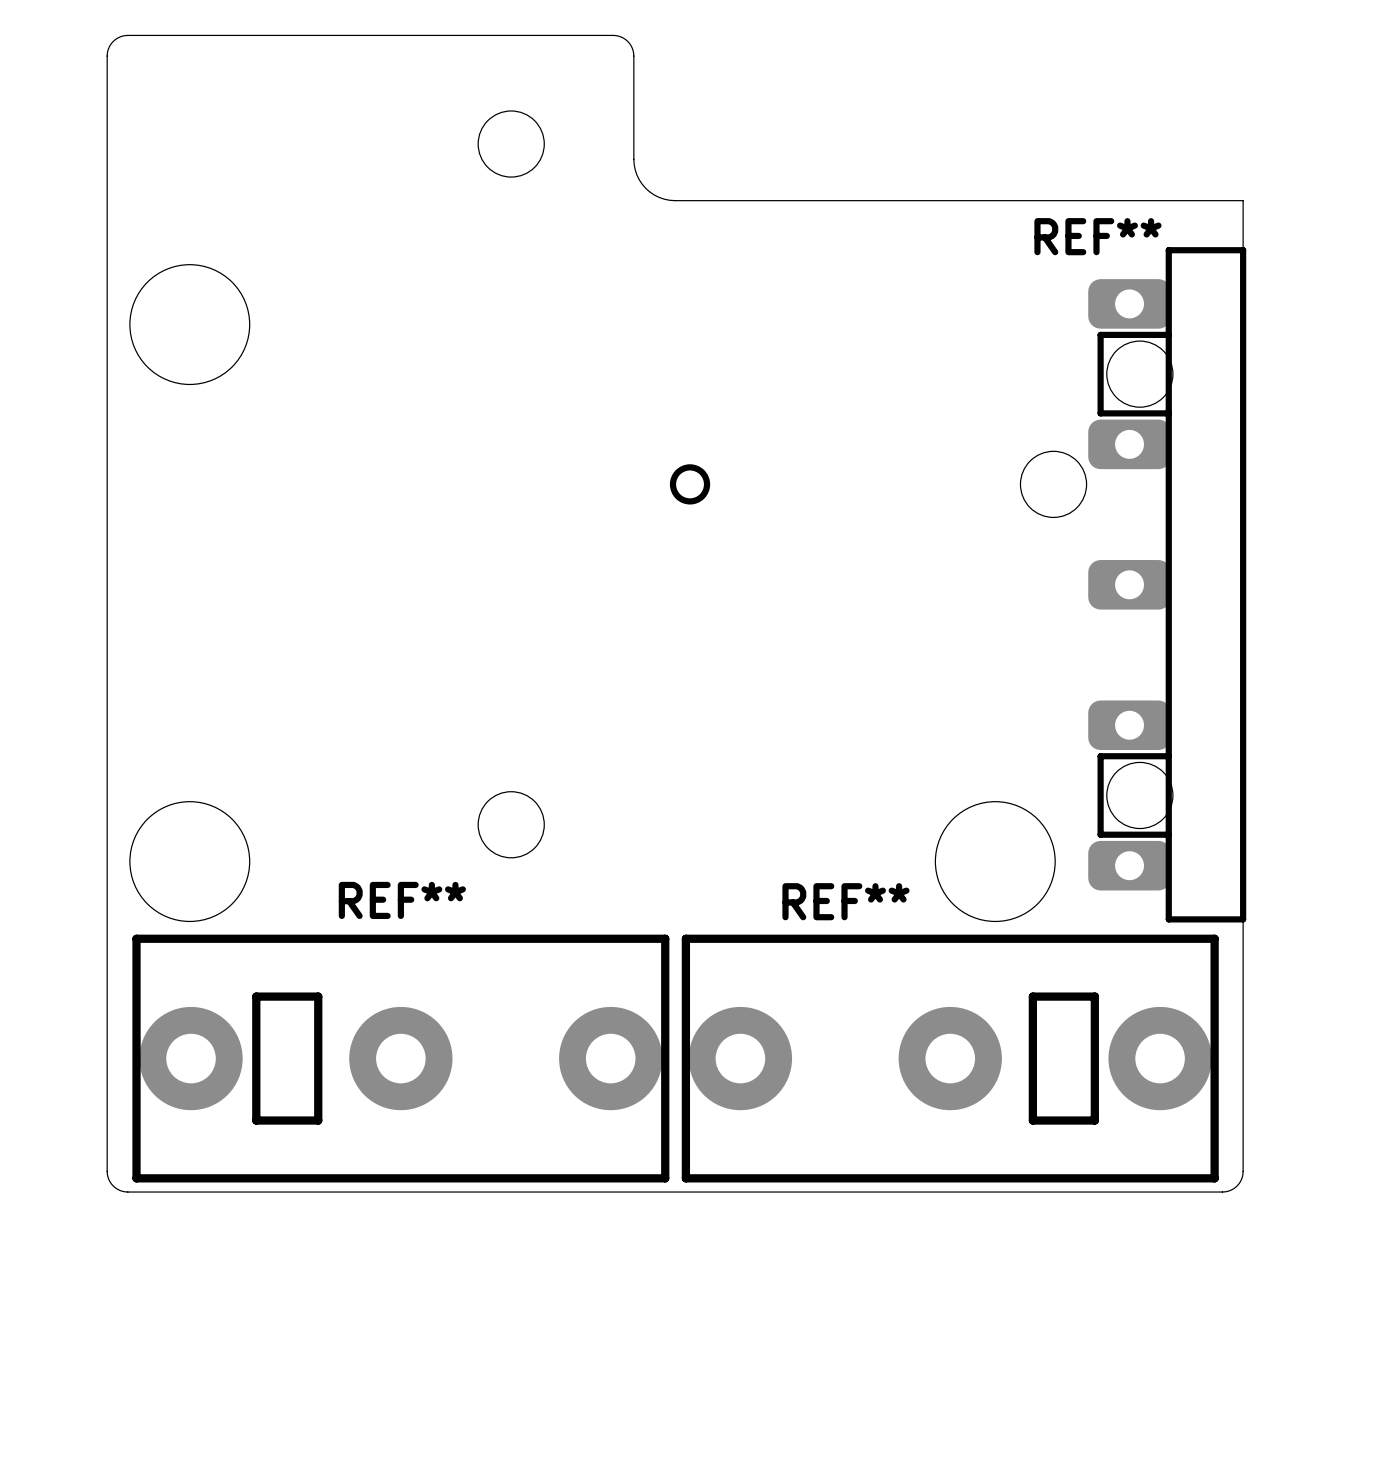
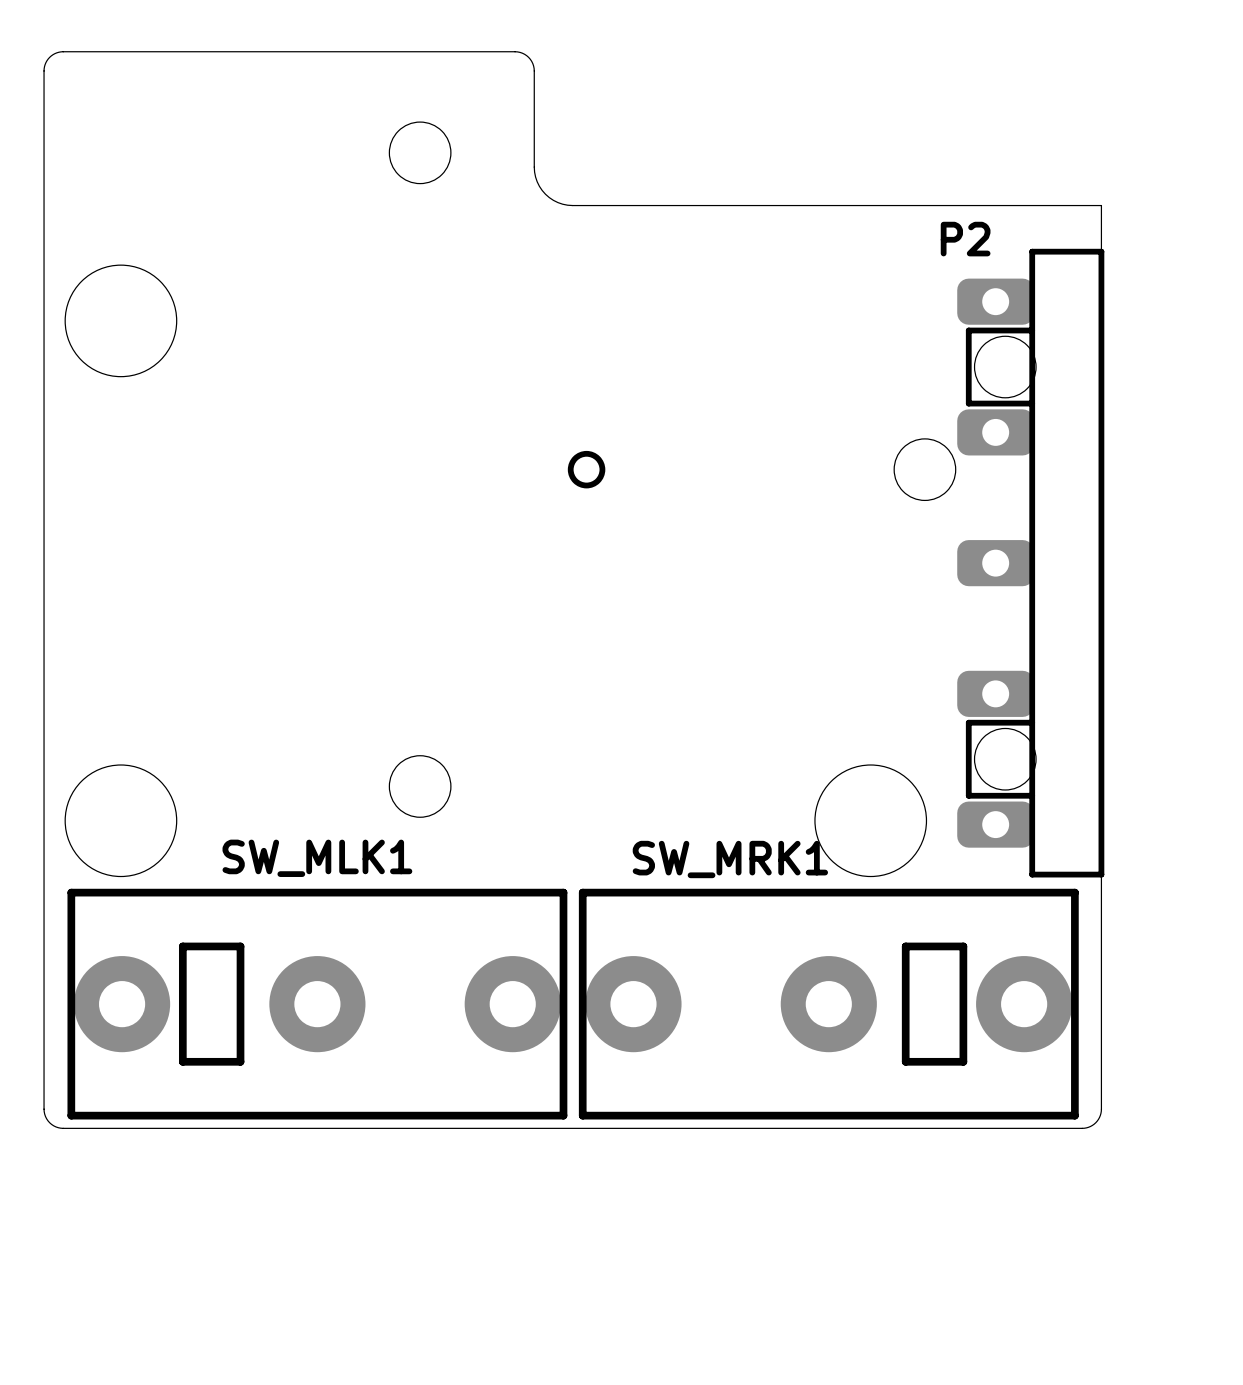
REF** name: REF** (1097, 236) -> P2 (965, 239)
REF** name: REF** (402, 900) -> SW_MLK1 (317, 858)
REF** name: REF** (845, 901) -> SW_MRK1 (730, 859)

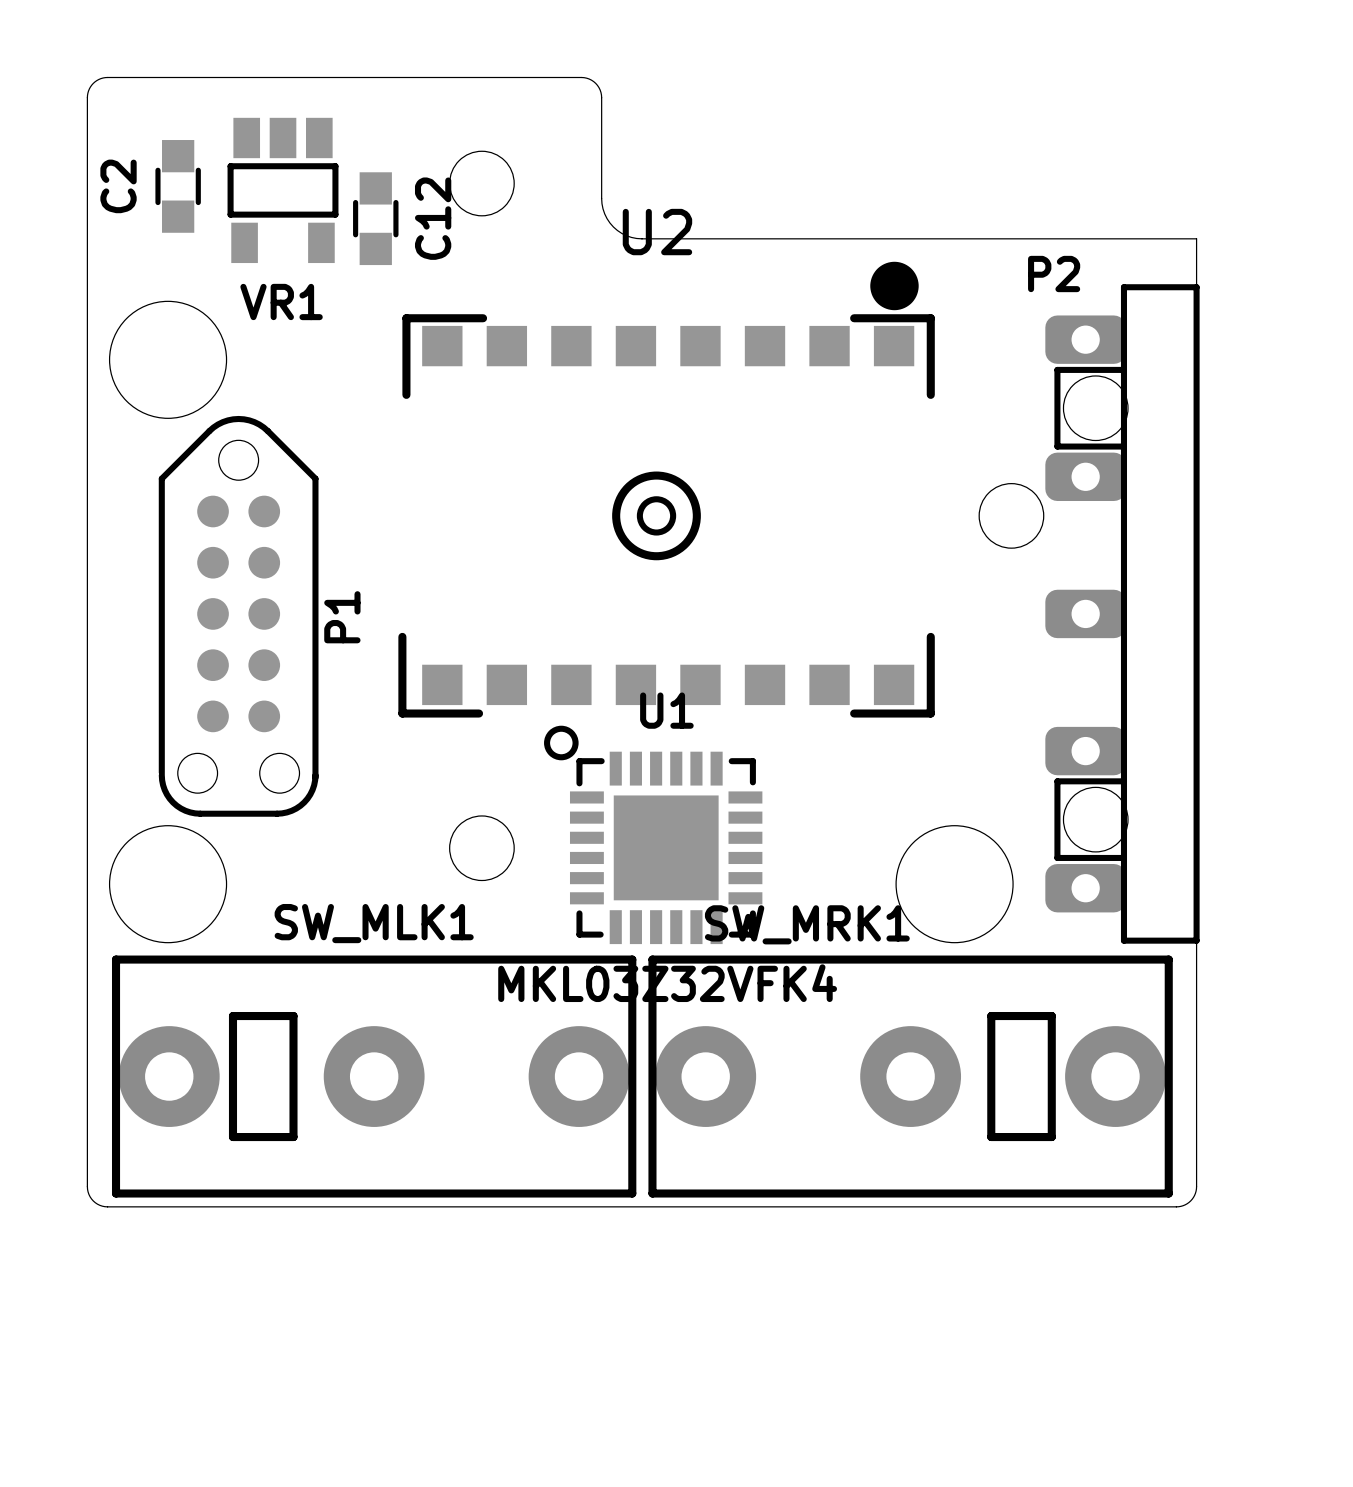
C2: none -> (178, 186)
VR1: none -> (283, 190)
C12: none -> (375, 218)
U2: none -> (666, 489)
P1: none -> (238, 616)
U1: none -> MKL03Z32VFK4 (653, 834)

